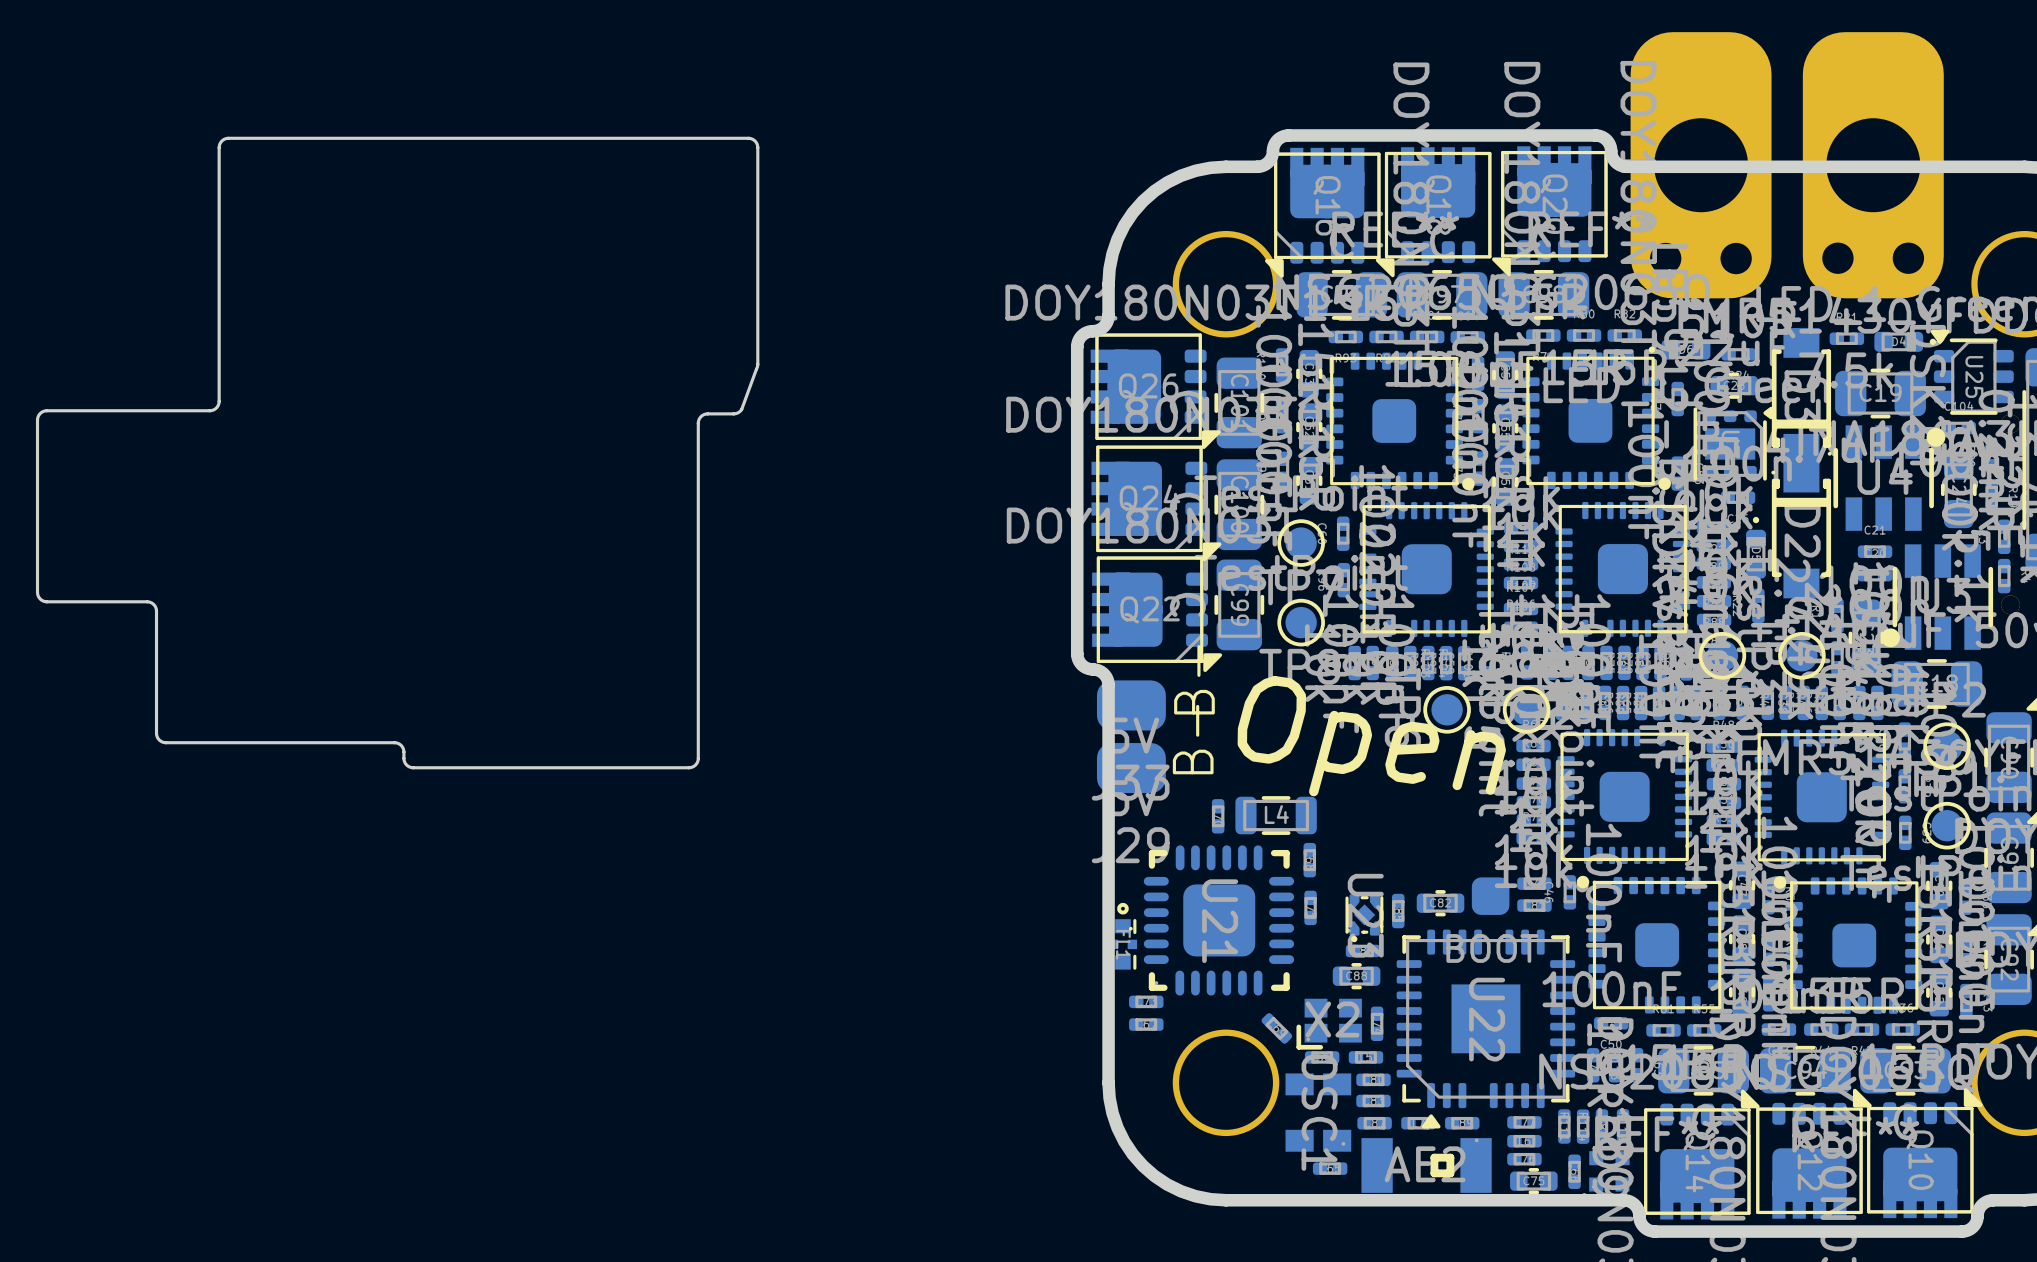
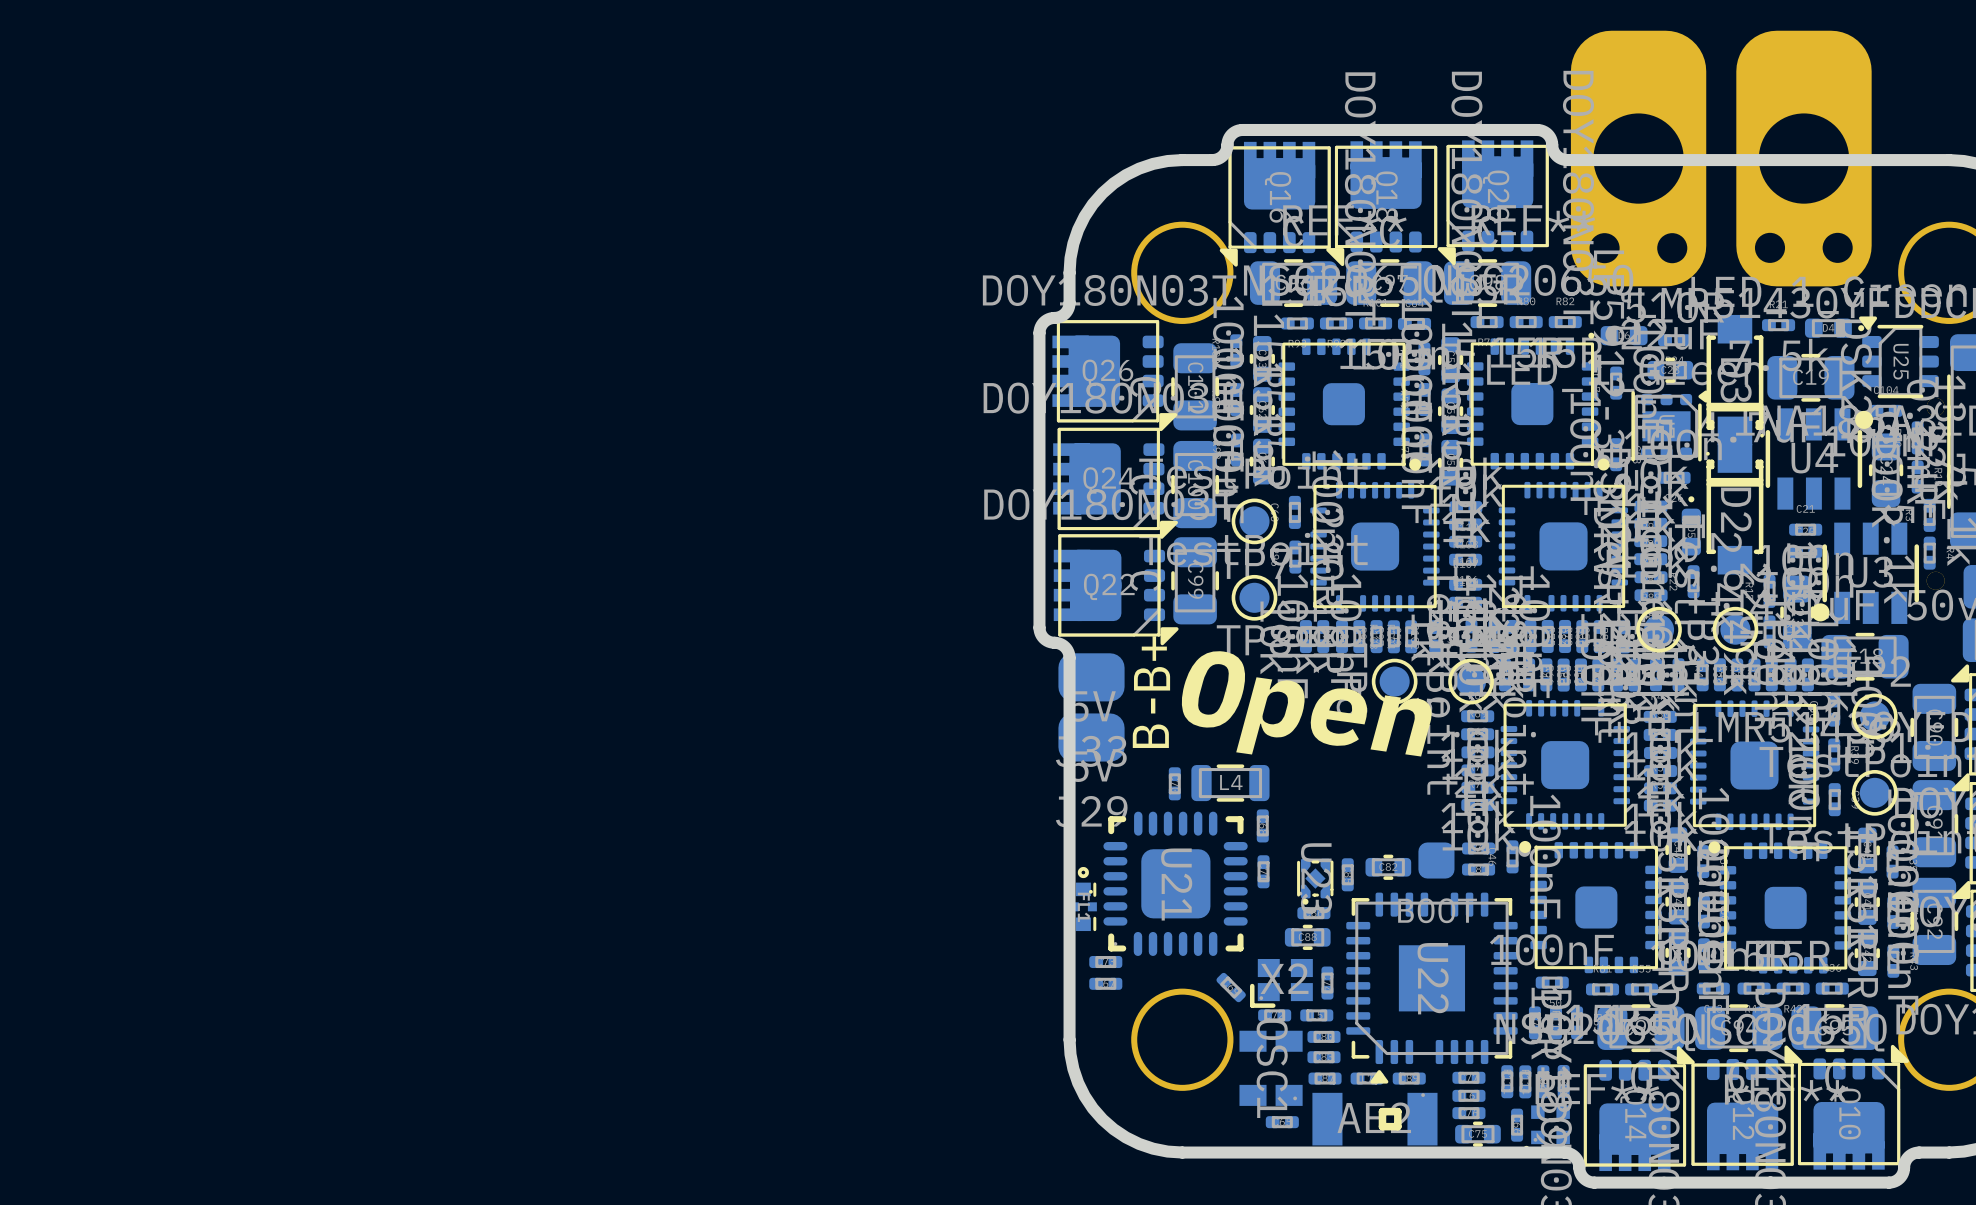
board edge: (748, 138) (223, 139) (219, 147) (218, 404) (215, 408) (209, 410) (46, 410) (40, 413) (37, 420) (38, 597) (45, 601) (147, 601) (154, 605) (156, 611) (156, 733) (158, 739) (163, 742) (395, 742) (403, 748) (405, 764) (413, 767) (693, 766) (698, 758) (698, 422) (700, 417) (705, 414) (734, 413) (740, 411) (757, 365) (757, 147) (755, 141) (748, 138) -> none

